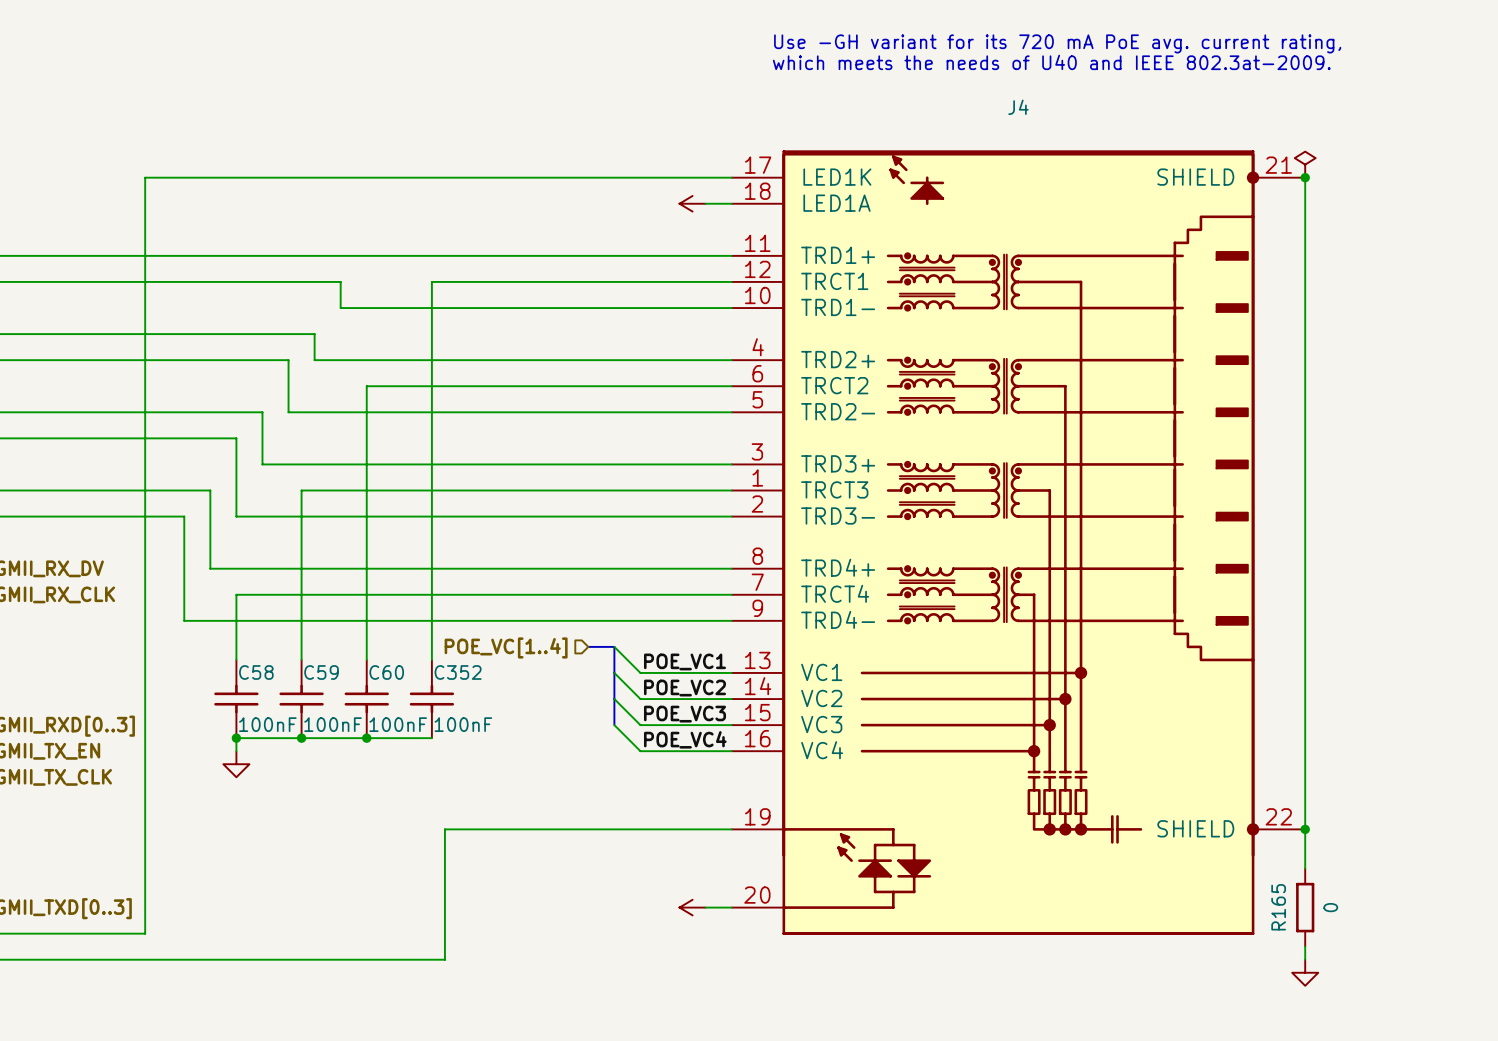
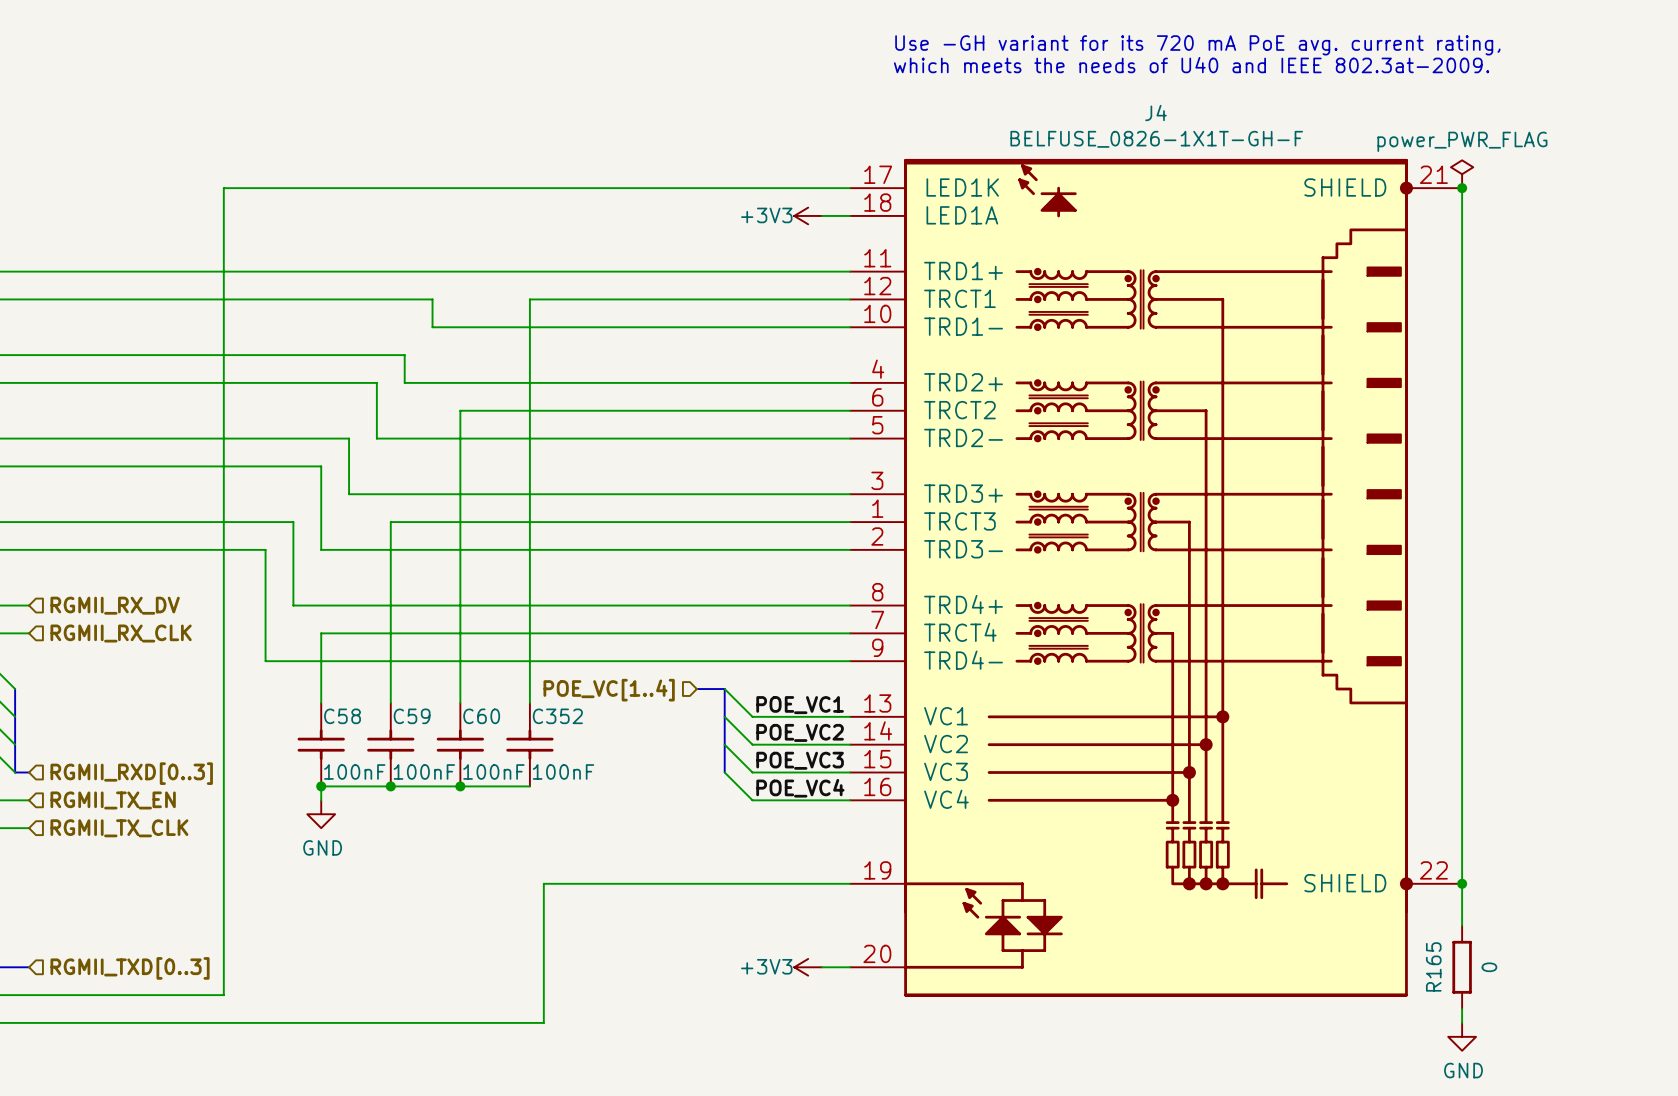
J4 value: none -> BELFUSE_0826-1X1T-GH-F (1156, 139)
power symbol text: none -> power_PWR_FLAG (1462, 141)
power symbol text: none -> +3V3 (766, 215)
power symbol text: none -> GND (322, 847)
power symbol text: none -> +3V3 (766, 966)
power symbol text: none -> GND (1463, 1070)

